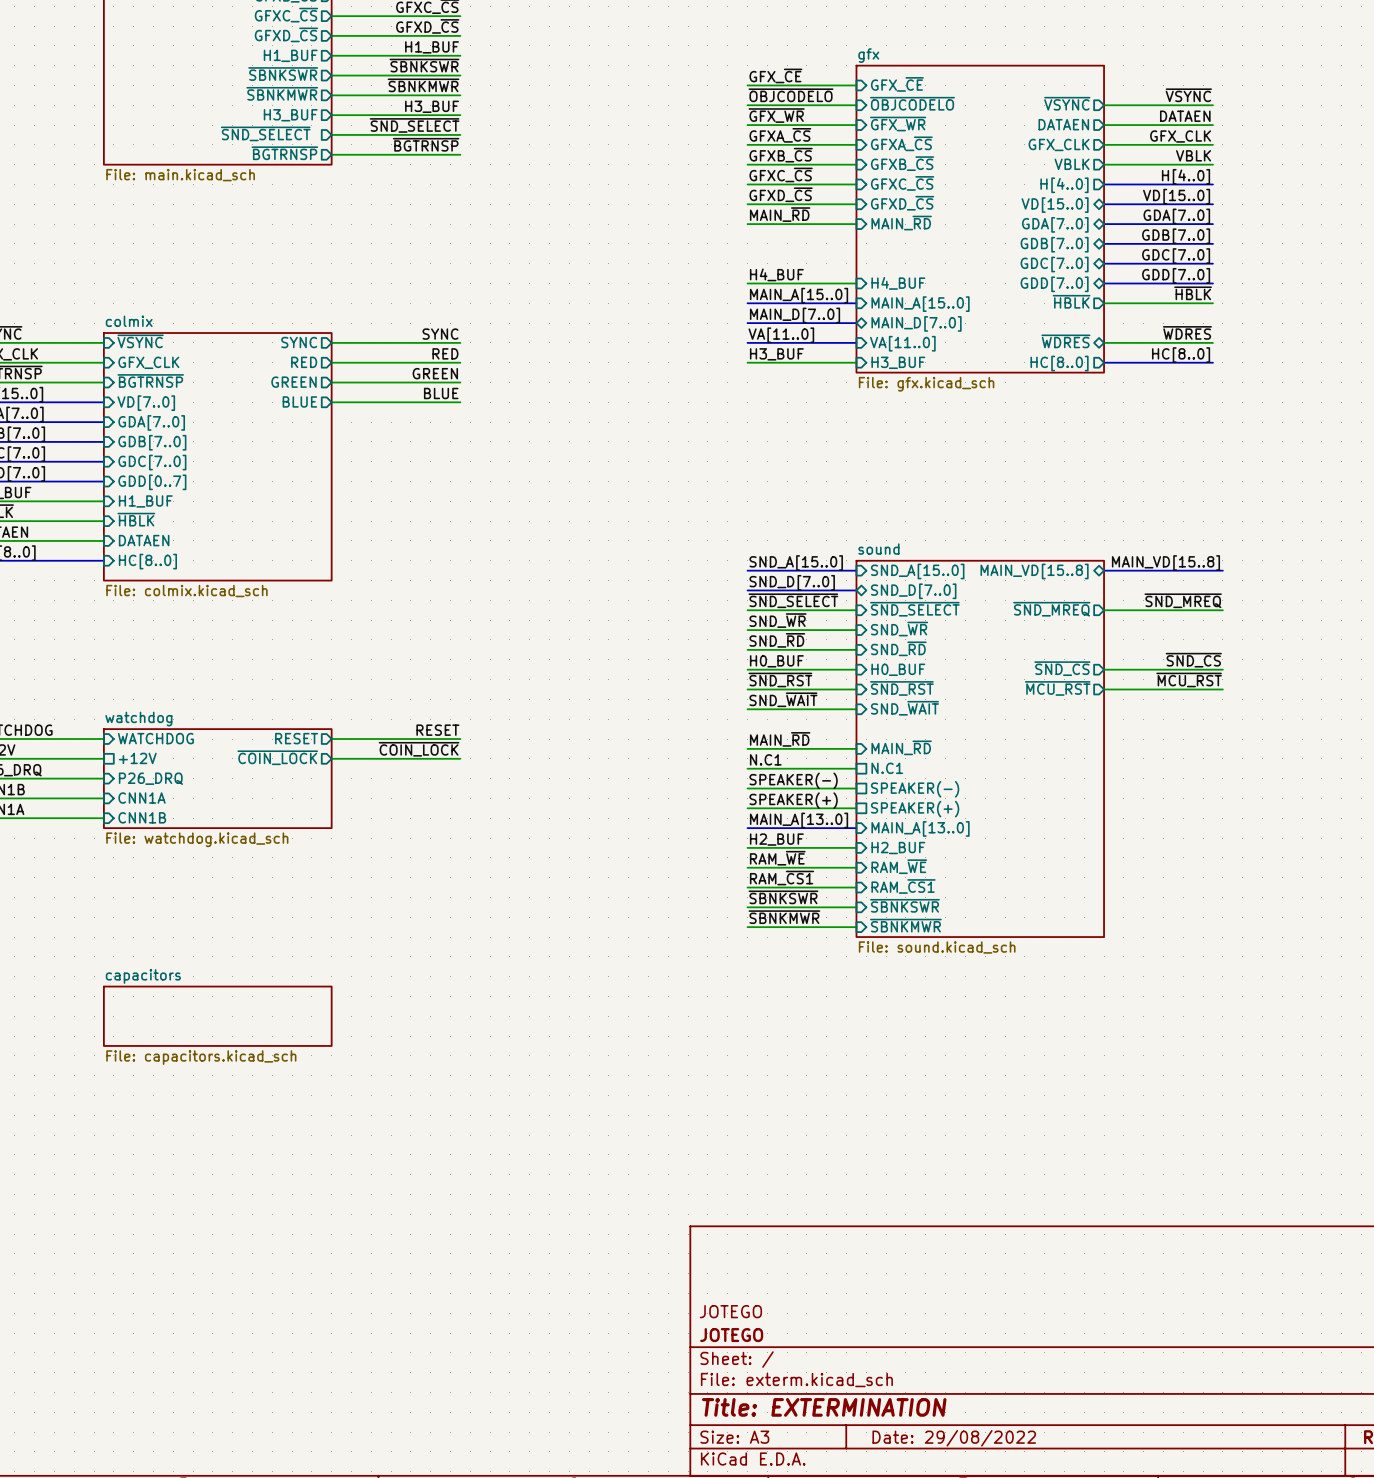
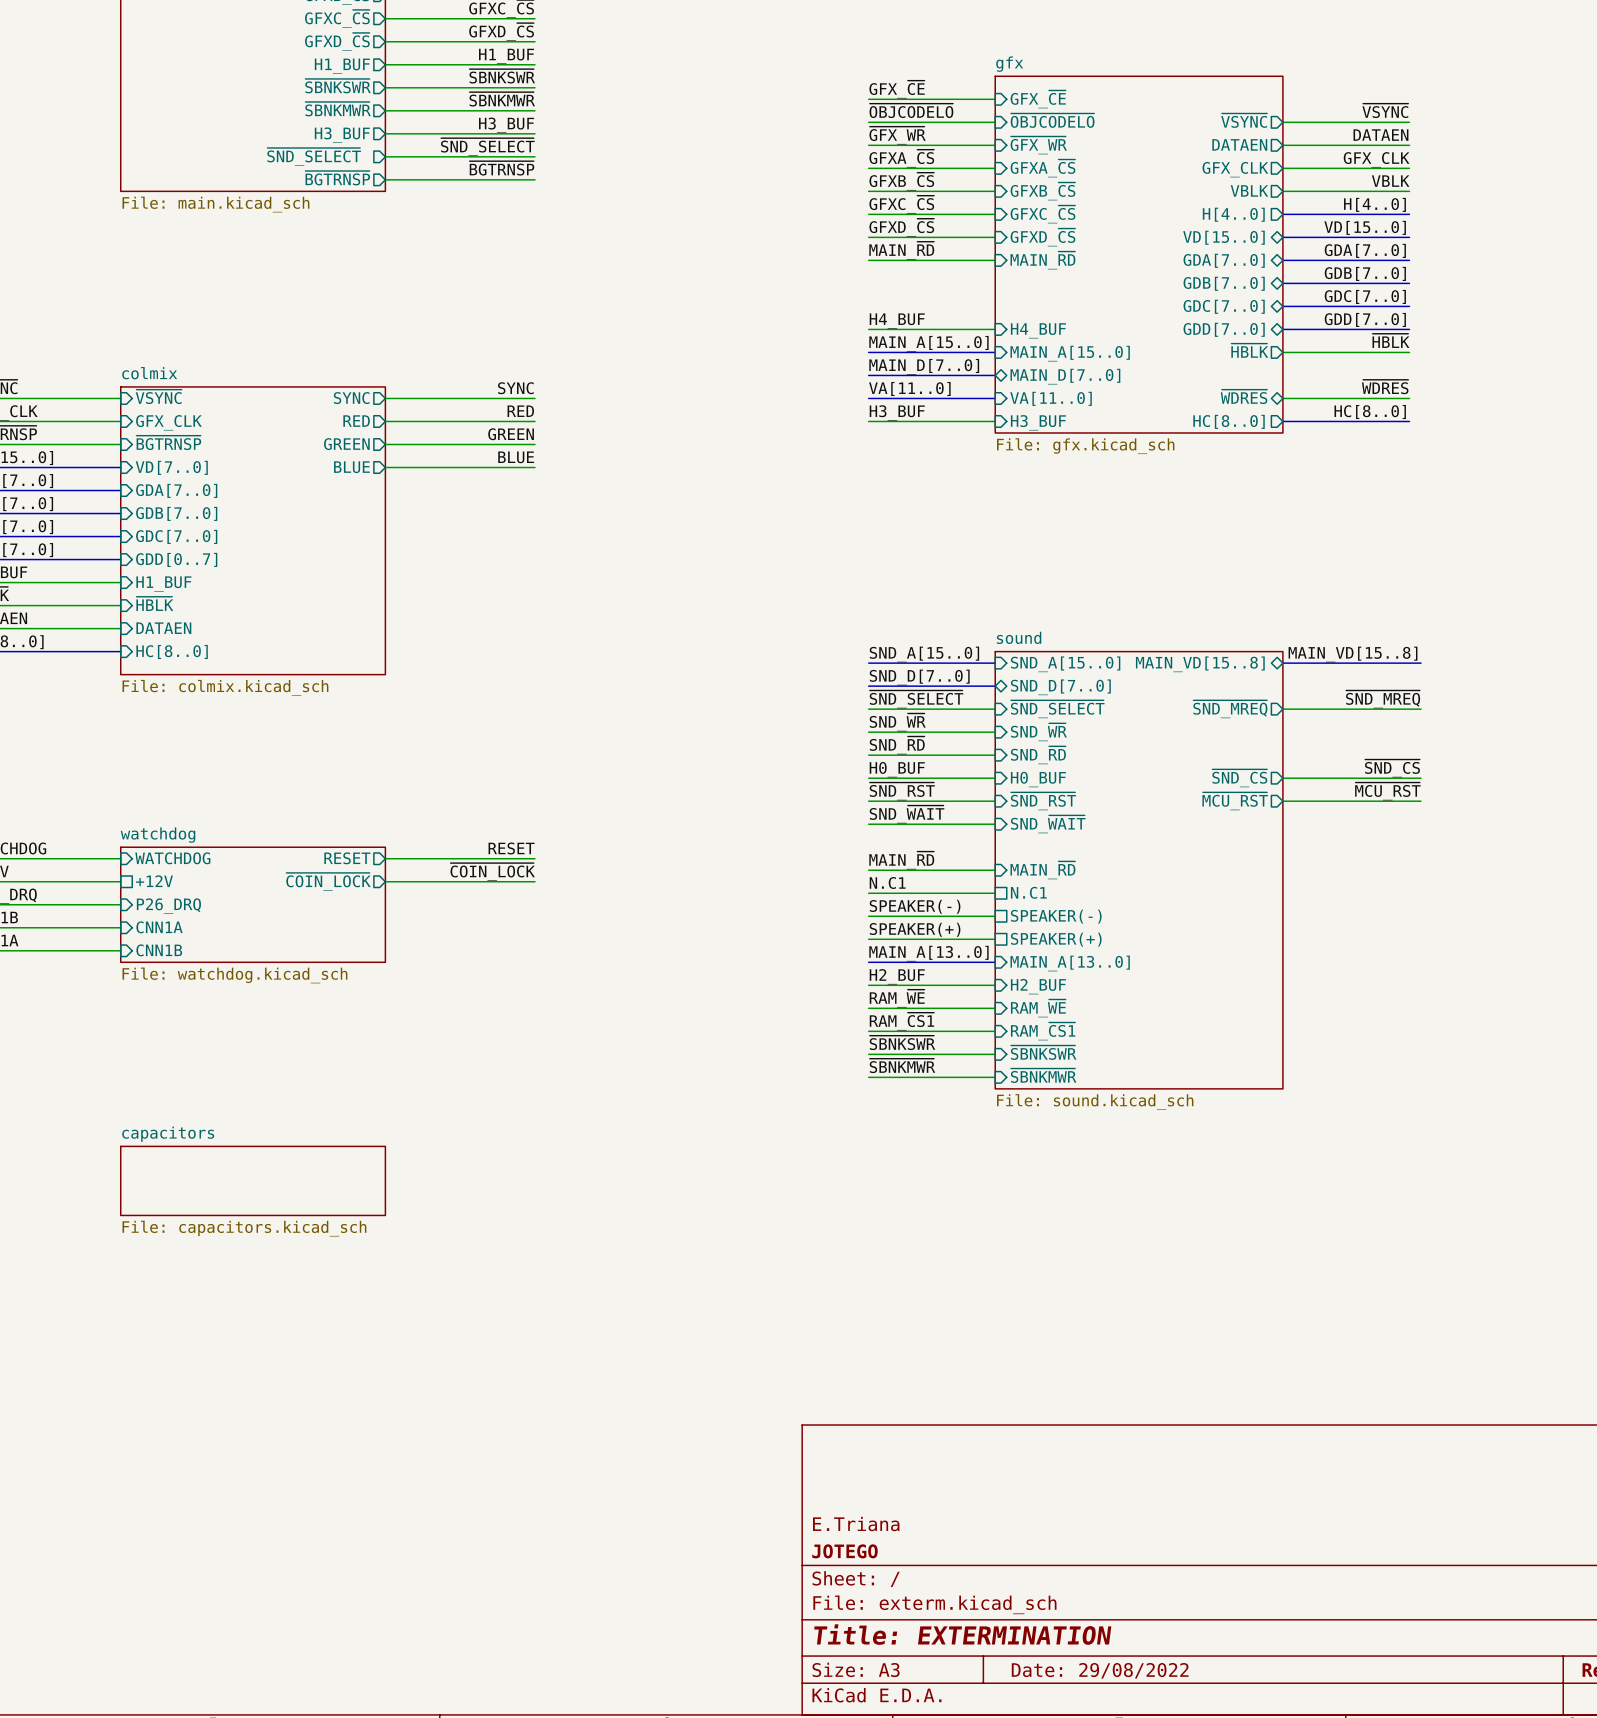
title block: JOTEGO (730, 1311) -> E.Triana (856, 1524)

